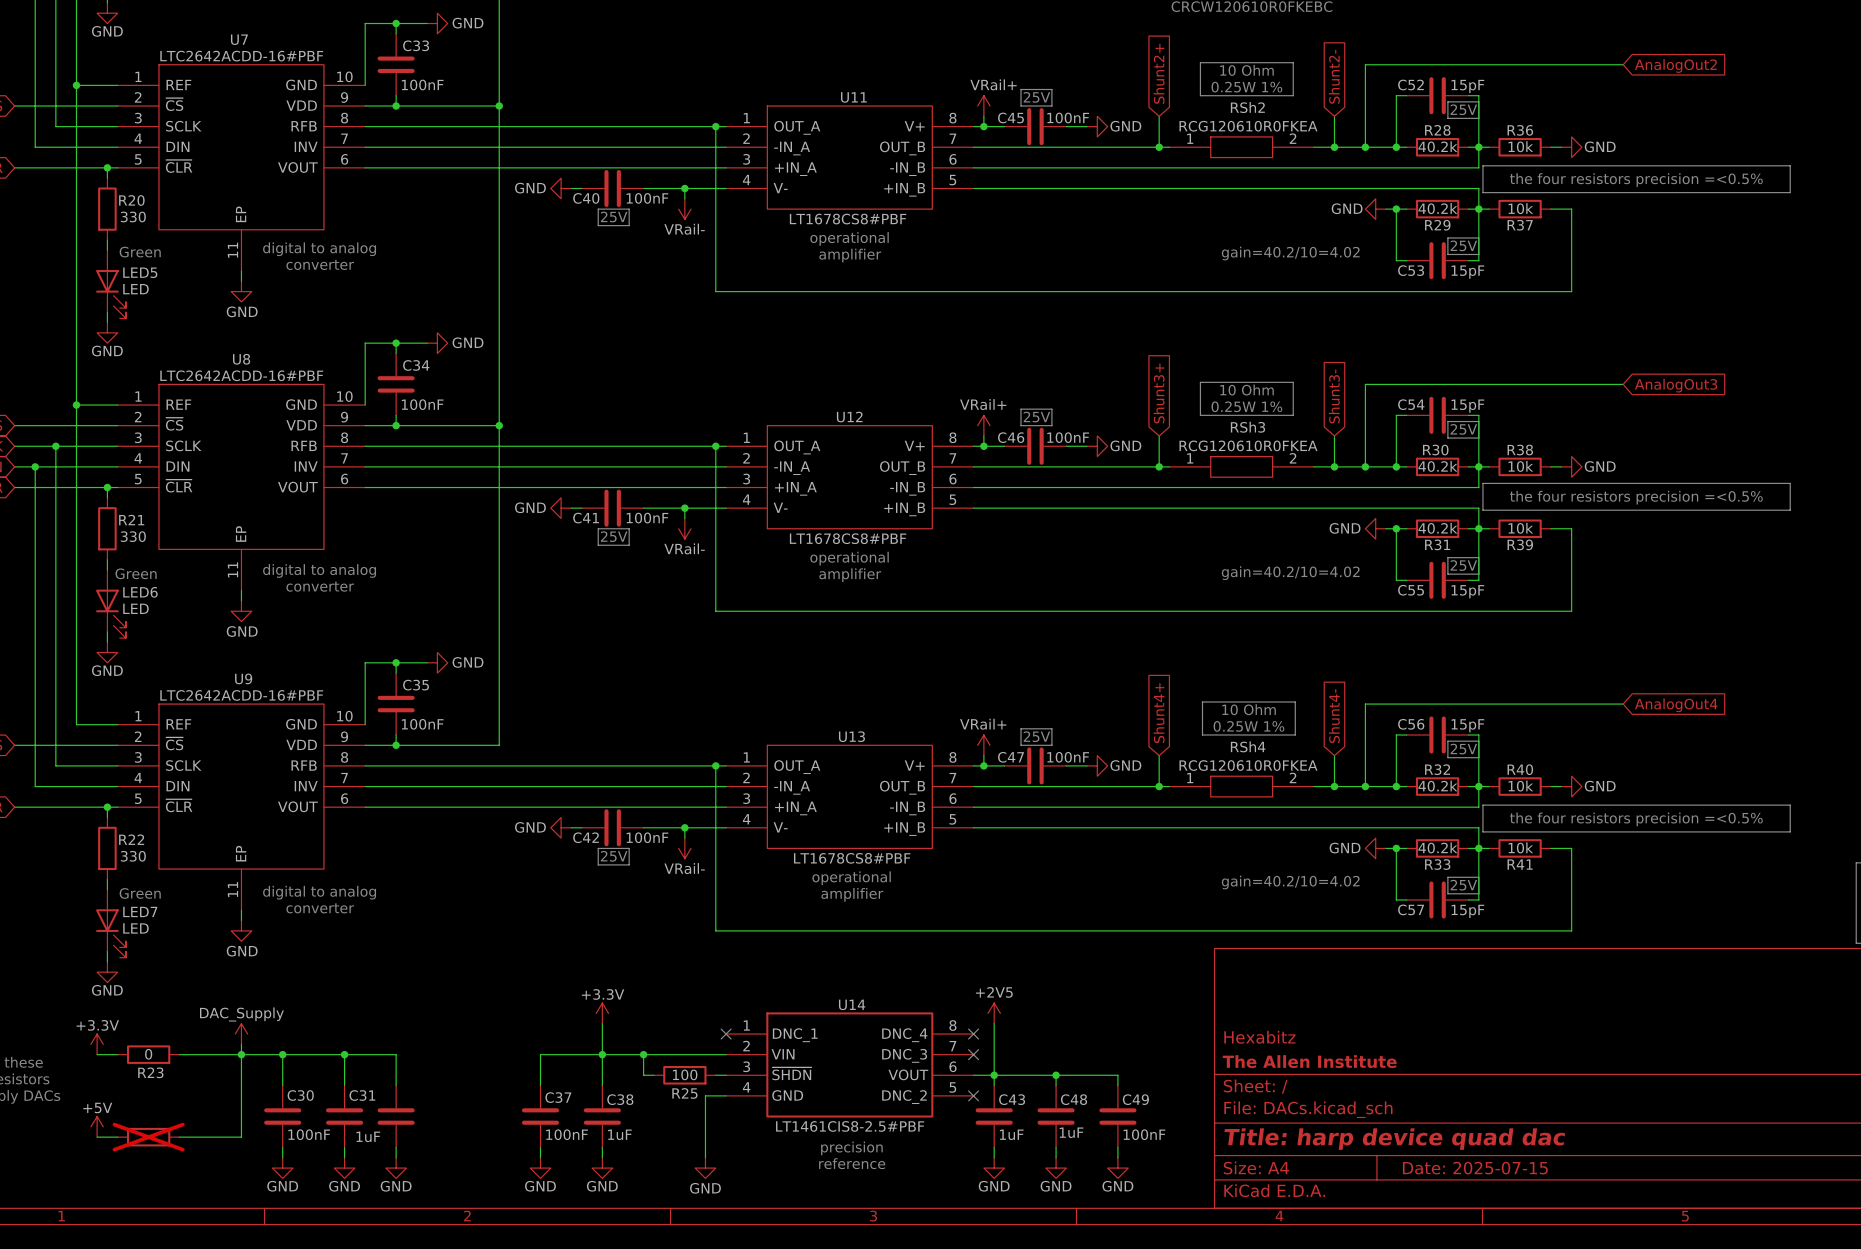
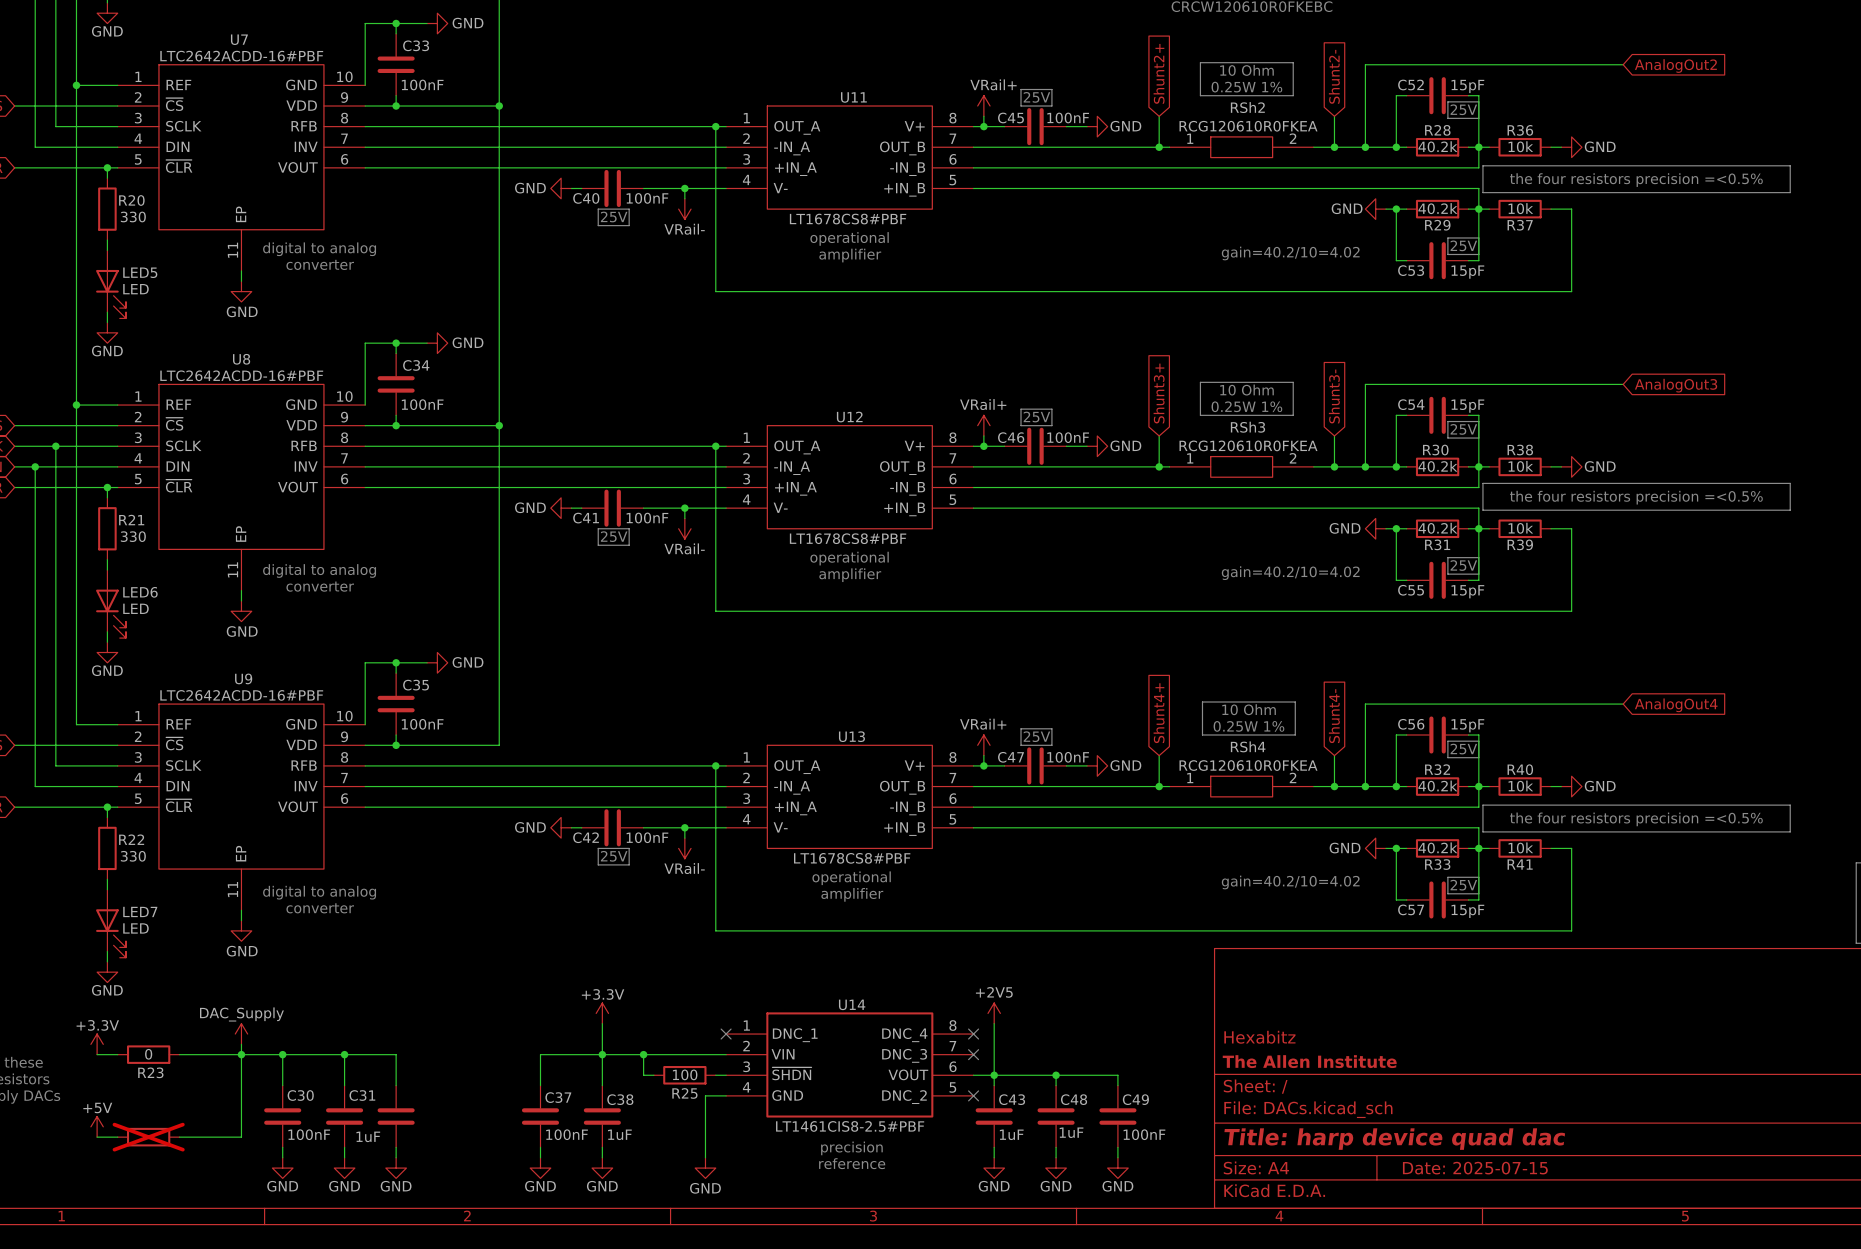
text: Green (140, 252) -> none
text: Green (136, 573) -> none
text: Green (140, 893) -> none

